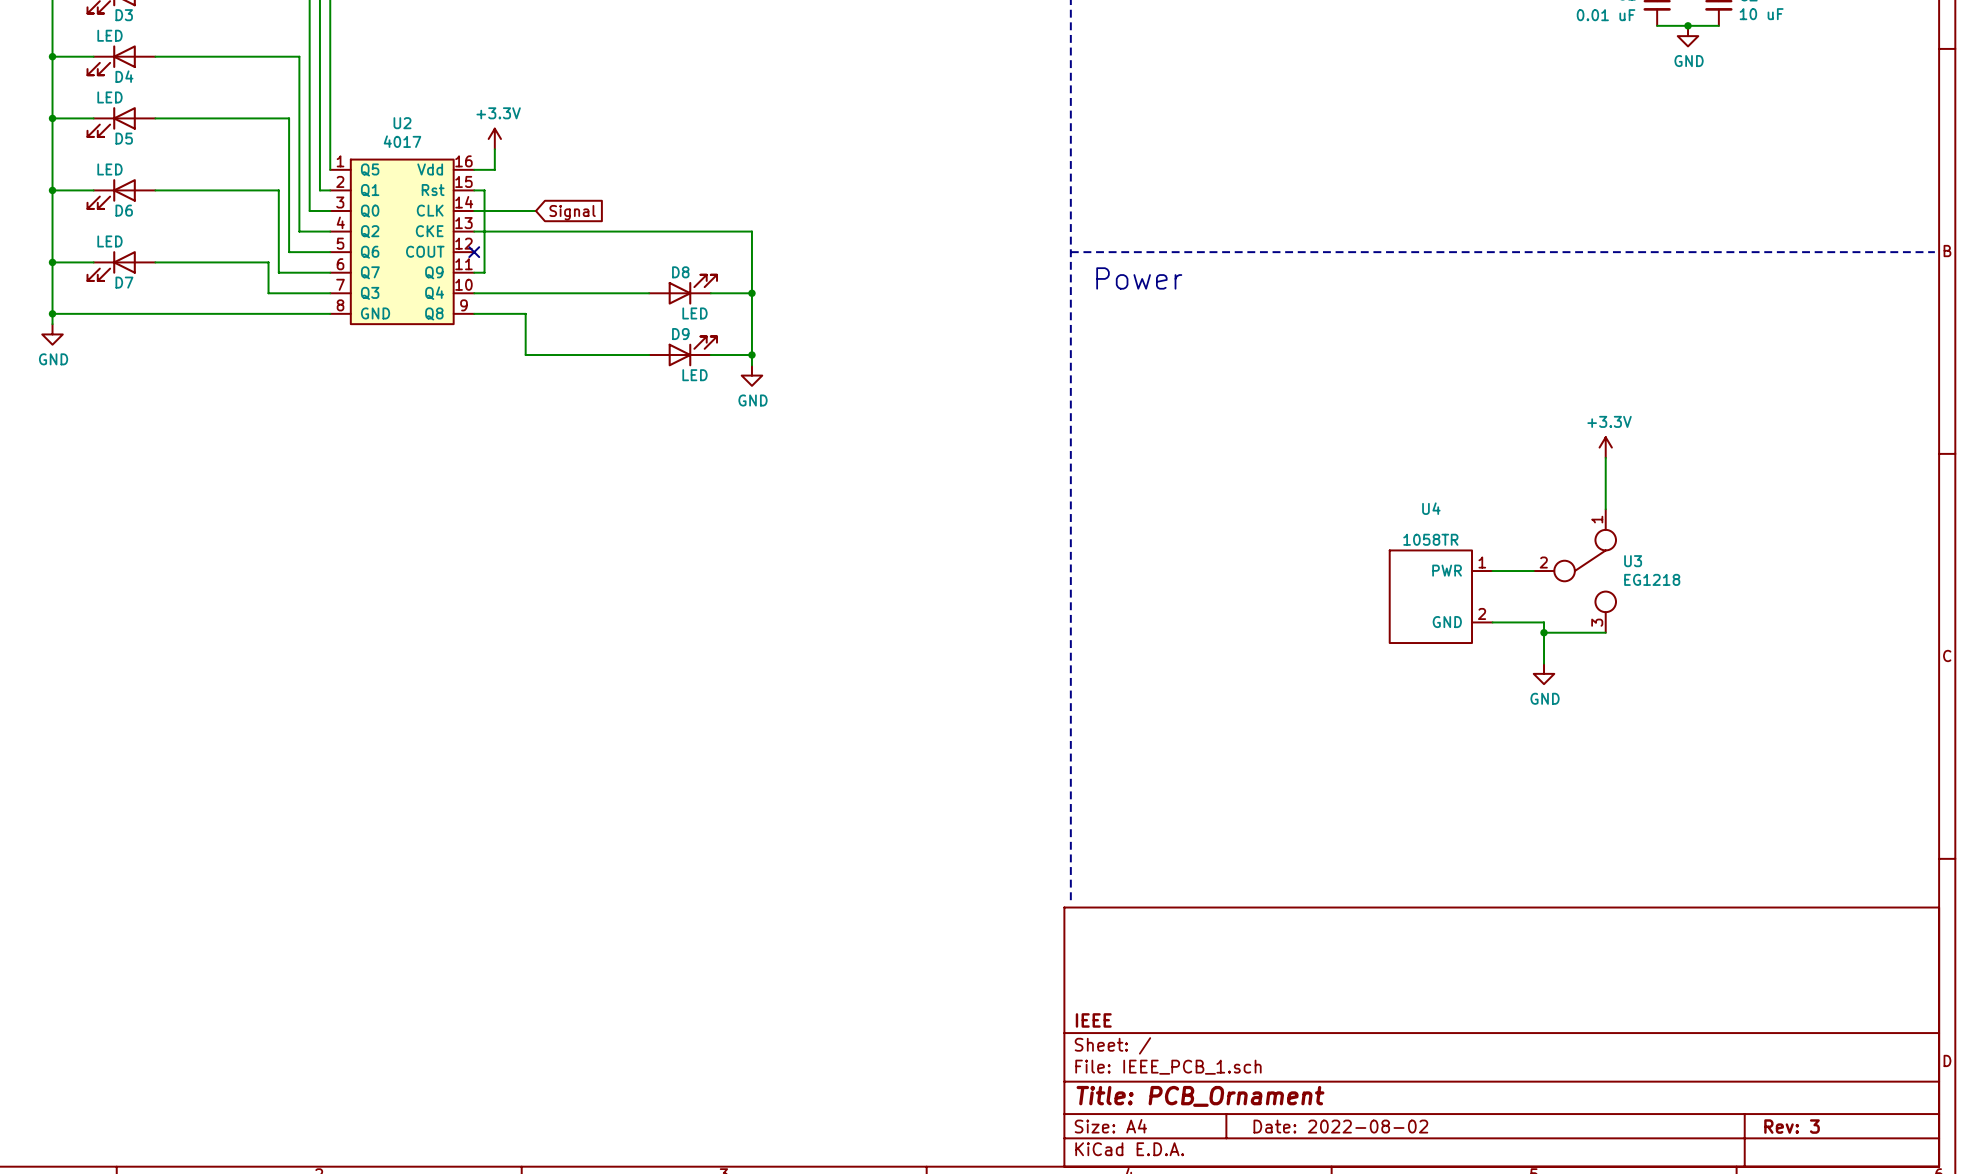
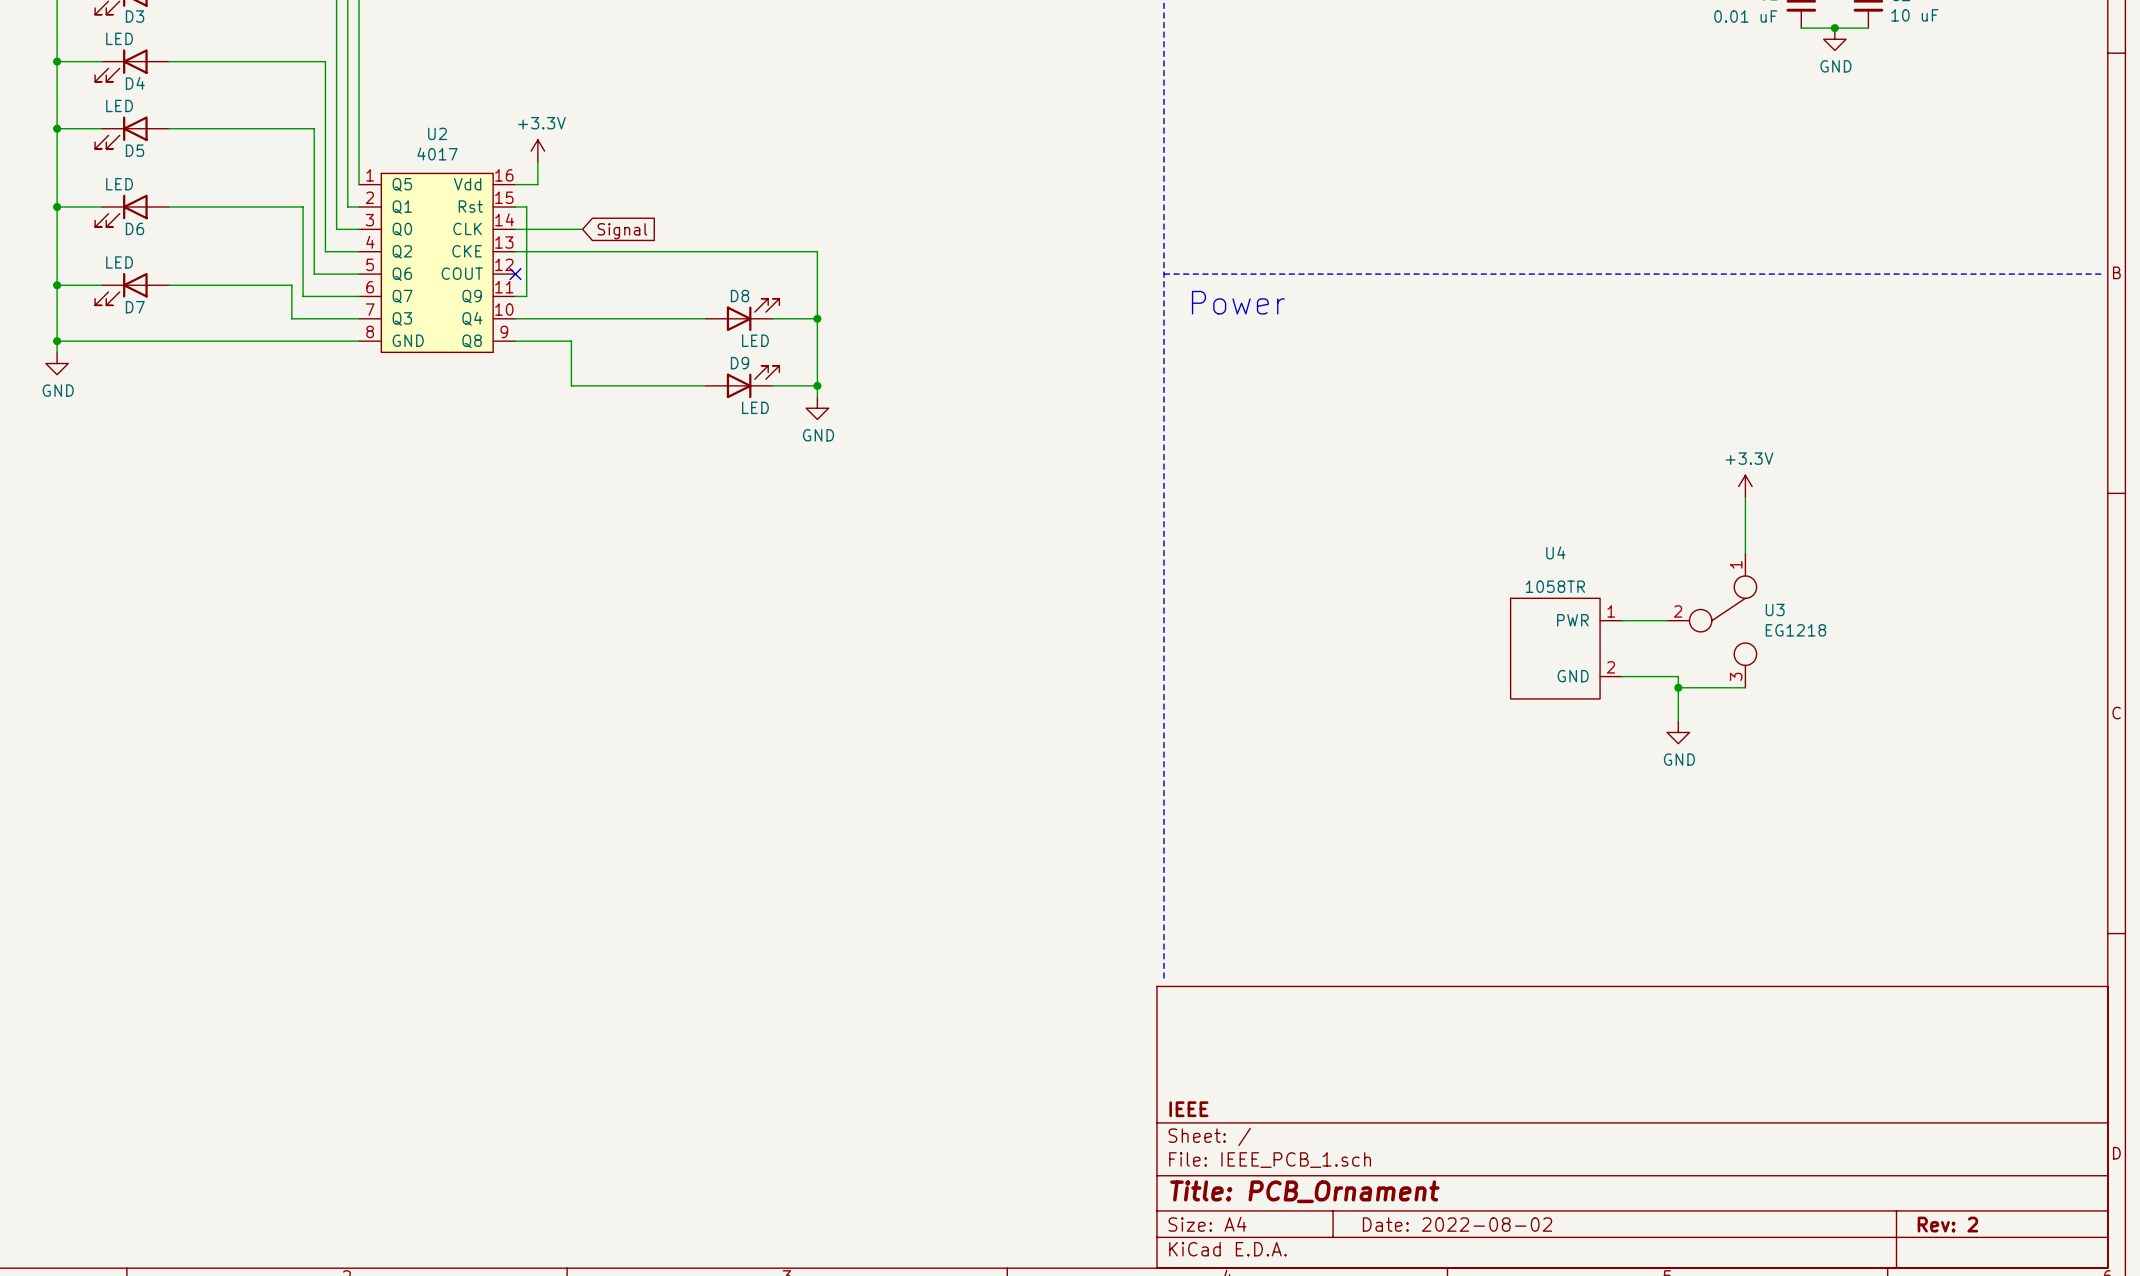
title block: Rev: 3 (1792, 1126) -> Rev: 2 (1947, 1224)

